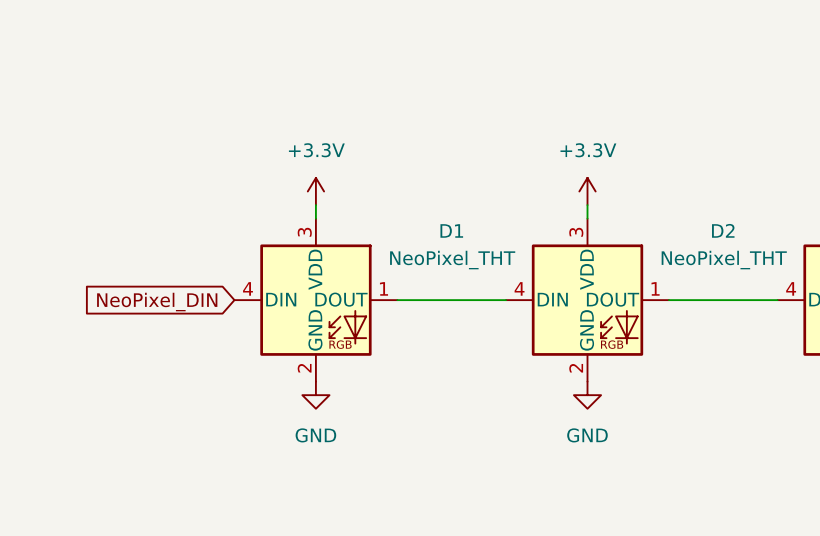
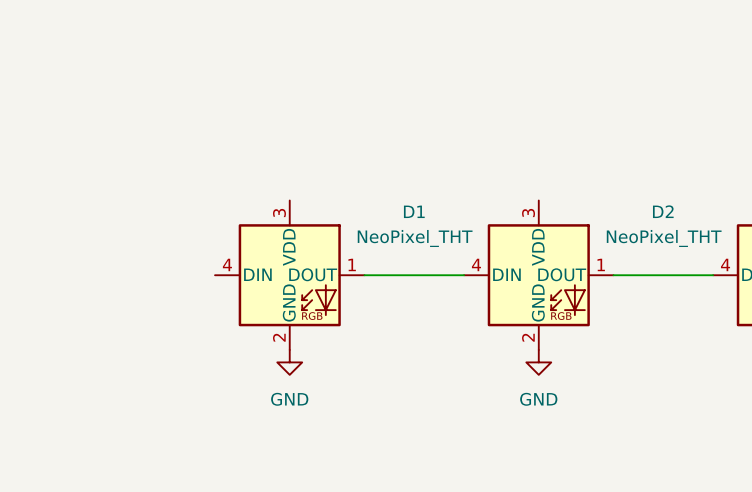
power symbol: +3.3V (315, 191) -> none
power symbol: +3.3V (587, 191) -> none
wire: (315, 205) (315, 218) -> none
wire: (587, 205) (587, 218) -> none
global label: NeoPixel_DIN (157, 302) -> none

